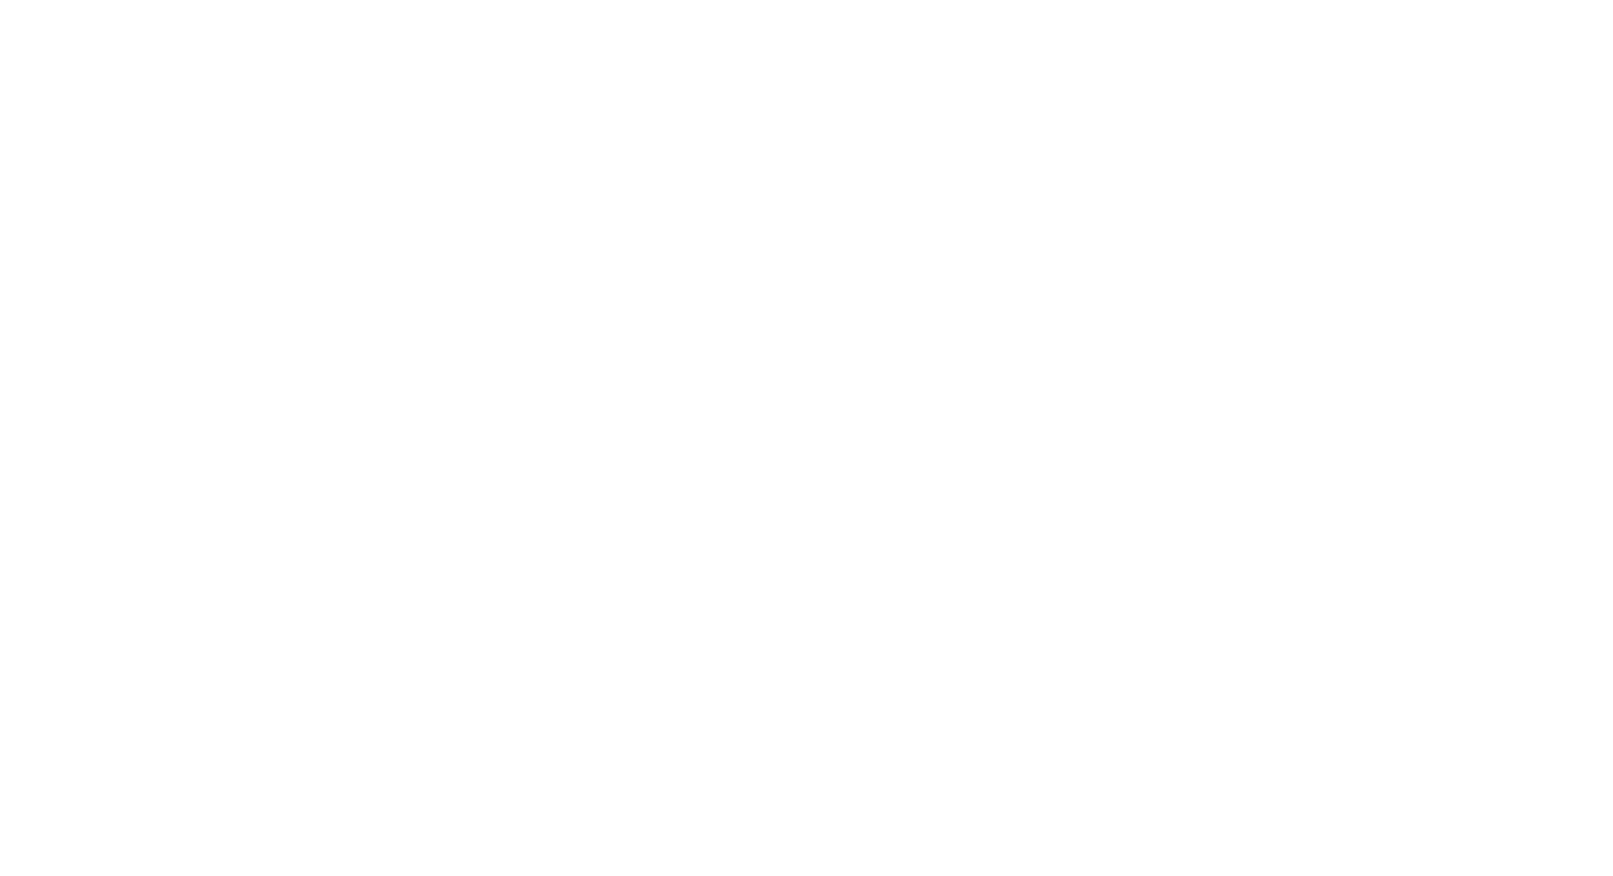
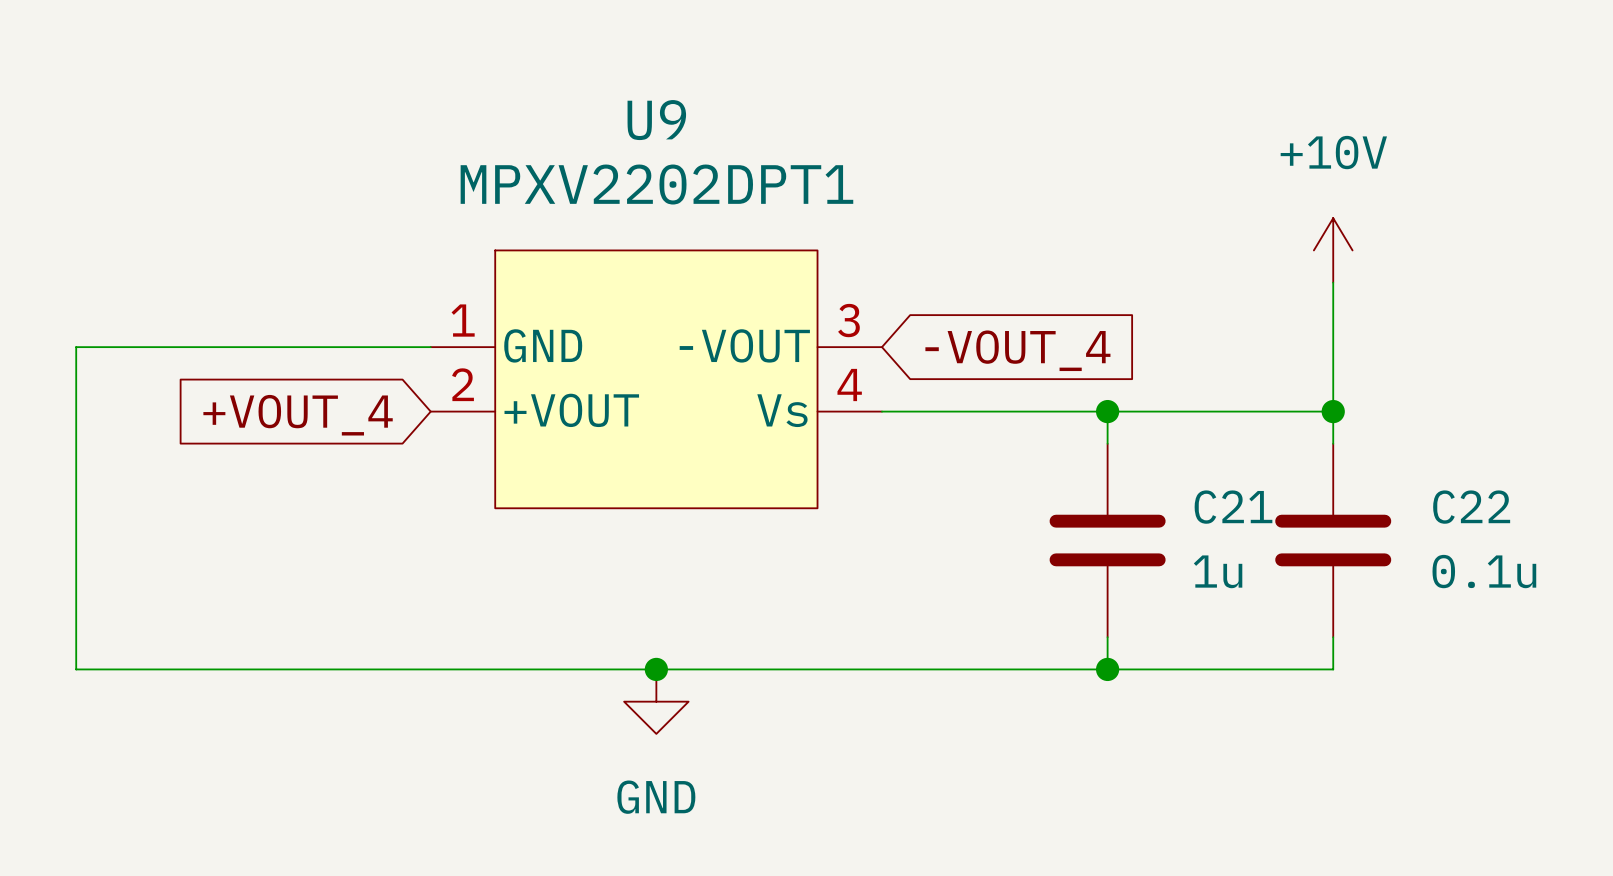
power symbol: none -> +10V (1333, 250)
wire: none -> (1333, 282) (1333, 443)
wire: none -> (430, 347) (76, 347) (76, 669) (1333, 669) (1333, 637)
global label: none -> -VOUT_4 (1017, 350)
U9: none -> MPXV2202DPT1 (656, 379)
global label: none -> +VOUT_4 (298, 415)
wire: none -> (881, 411) (1333, 411)
wire: none -> (1107, 411) (1107, 443)
junction: none -> (1107, 411)
junction: none -> (1333, 411)
C21: none -> 1u (1107, 540)
C22: none -> 0.1u (1333, 540)
wire: none -> (1107, 637) (1107, 669)
junction: none -> (656, 669)
junction: none -> (1107, 669)
power symbol: none -> GND (656, 701)

